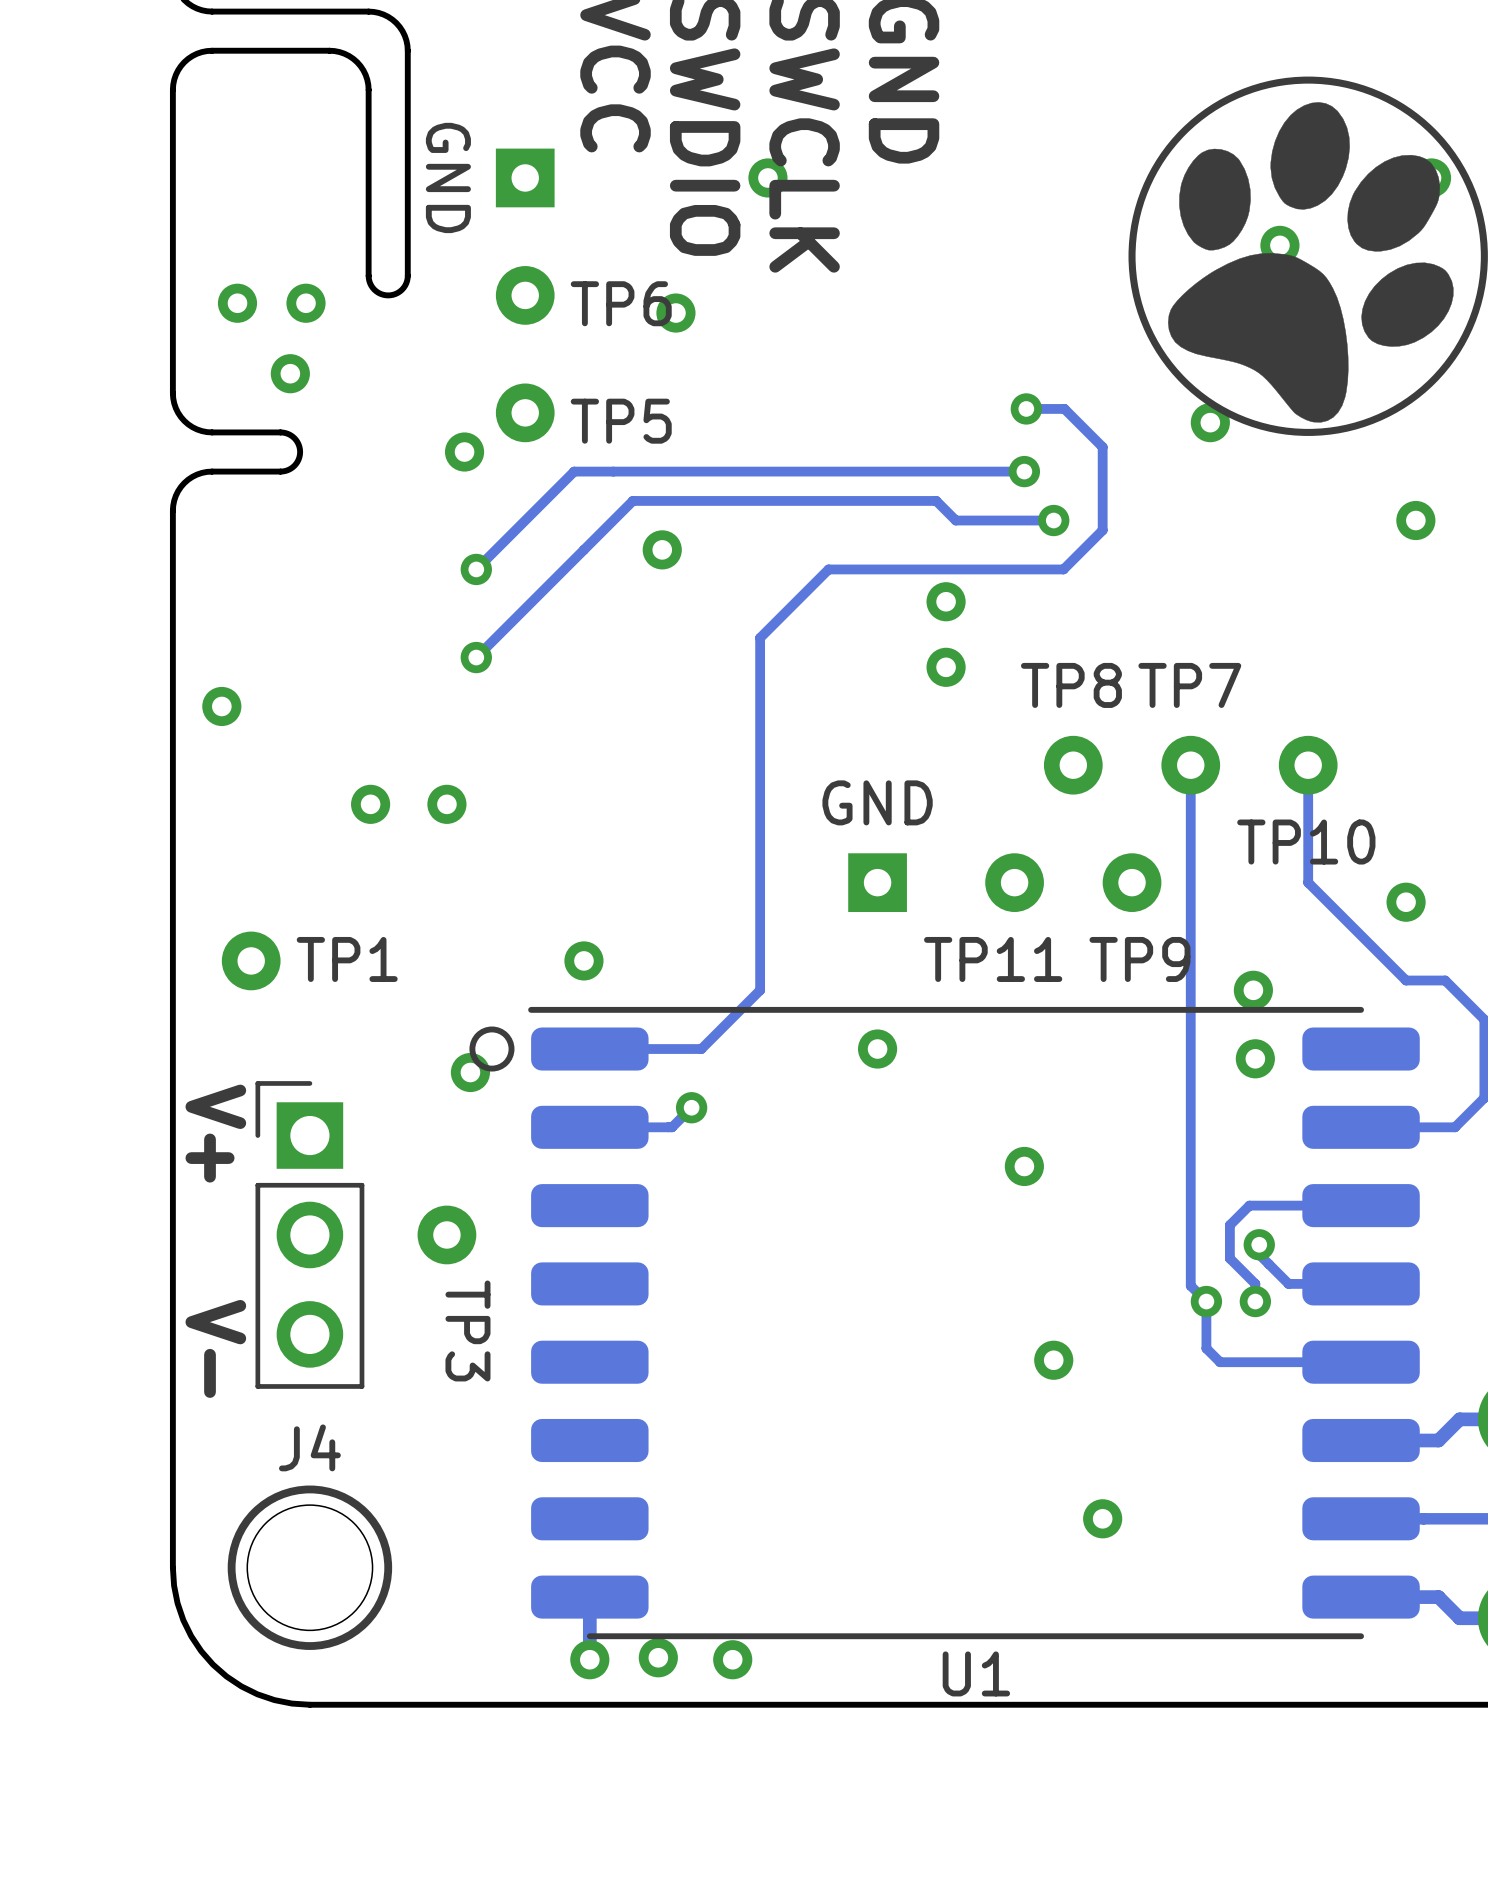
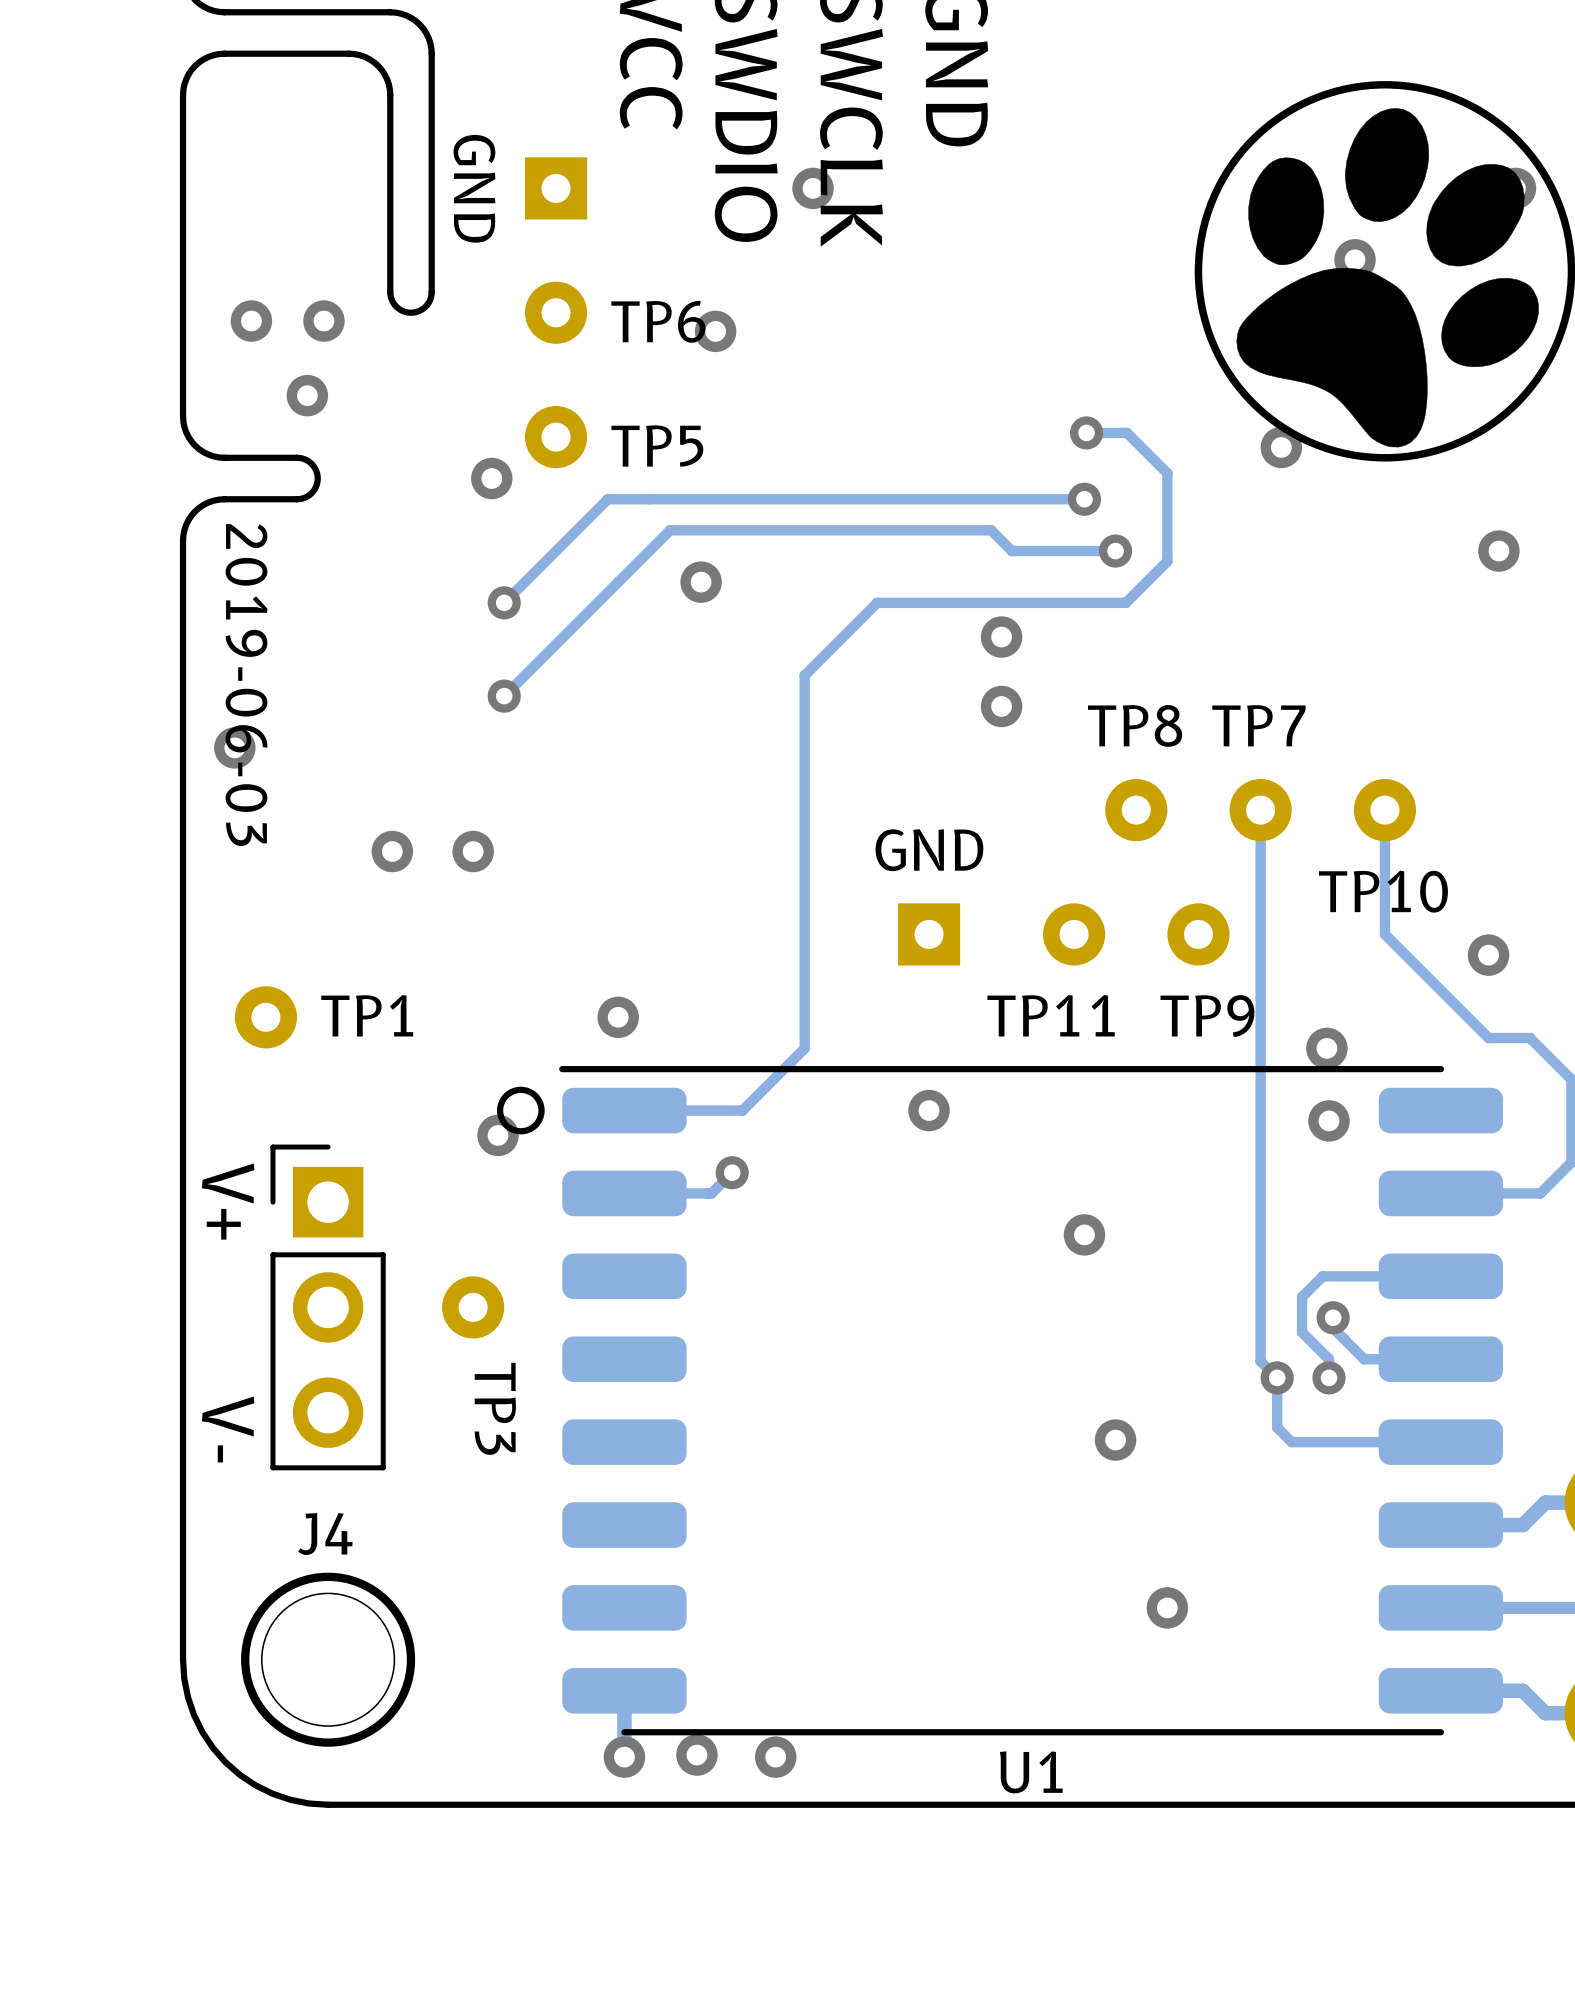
text: none -> 2019-06-03 (246, 685)

